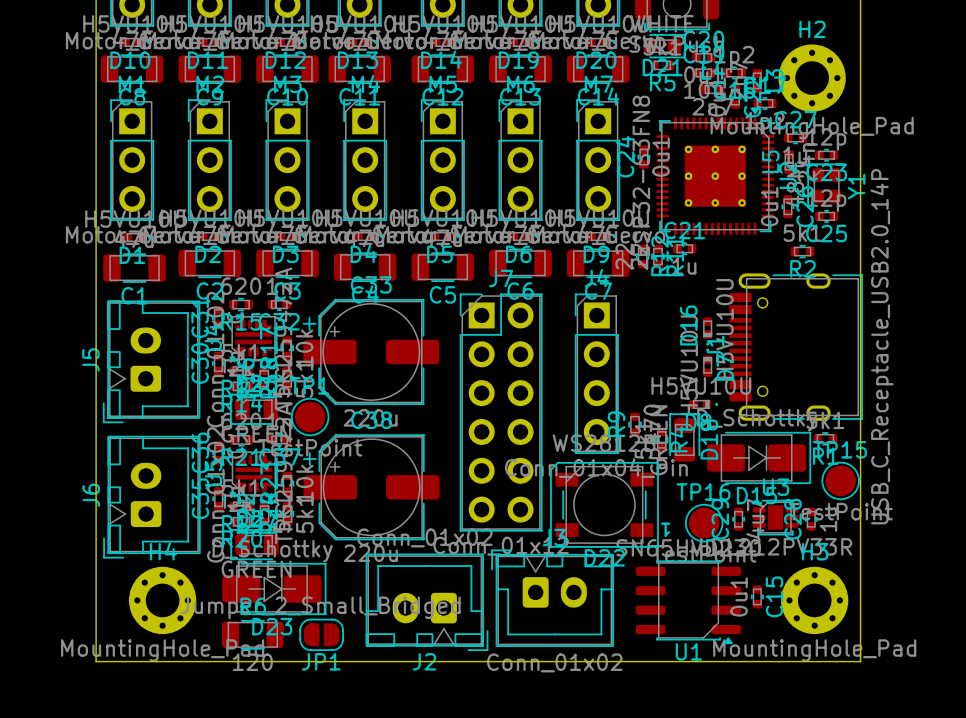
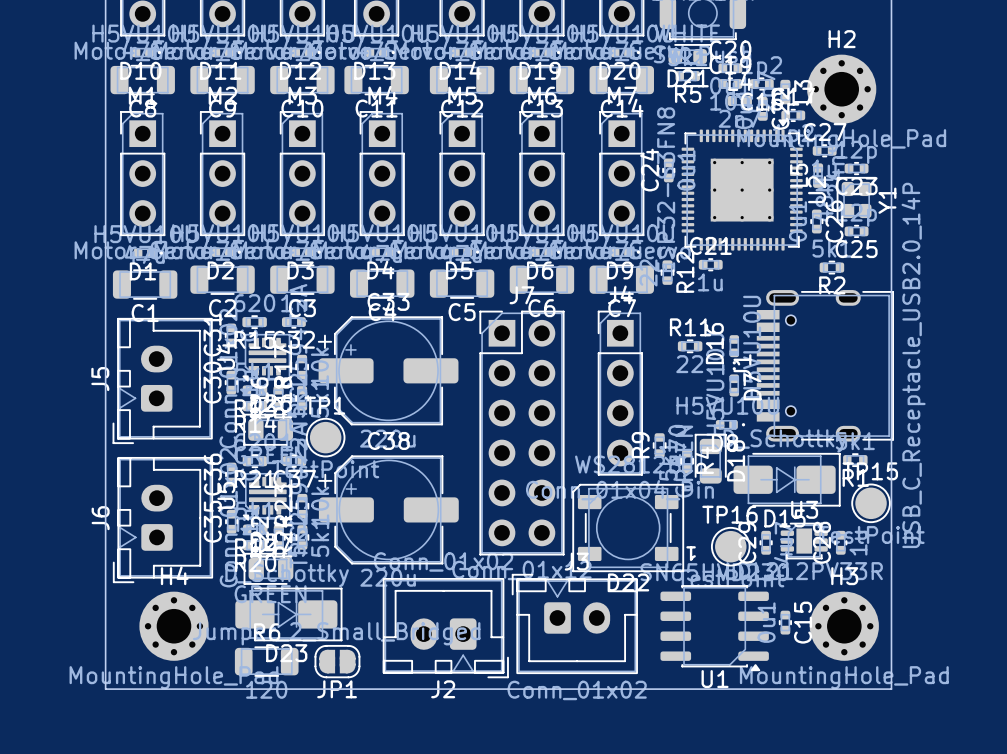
R11 rotation: 0° (657, 256) -> 90° clockwise (690, 346)
R11 position: (657, 256) -> (690, 346)

